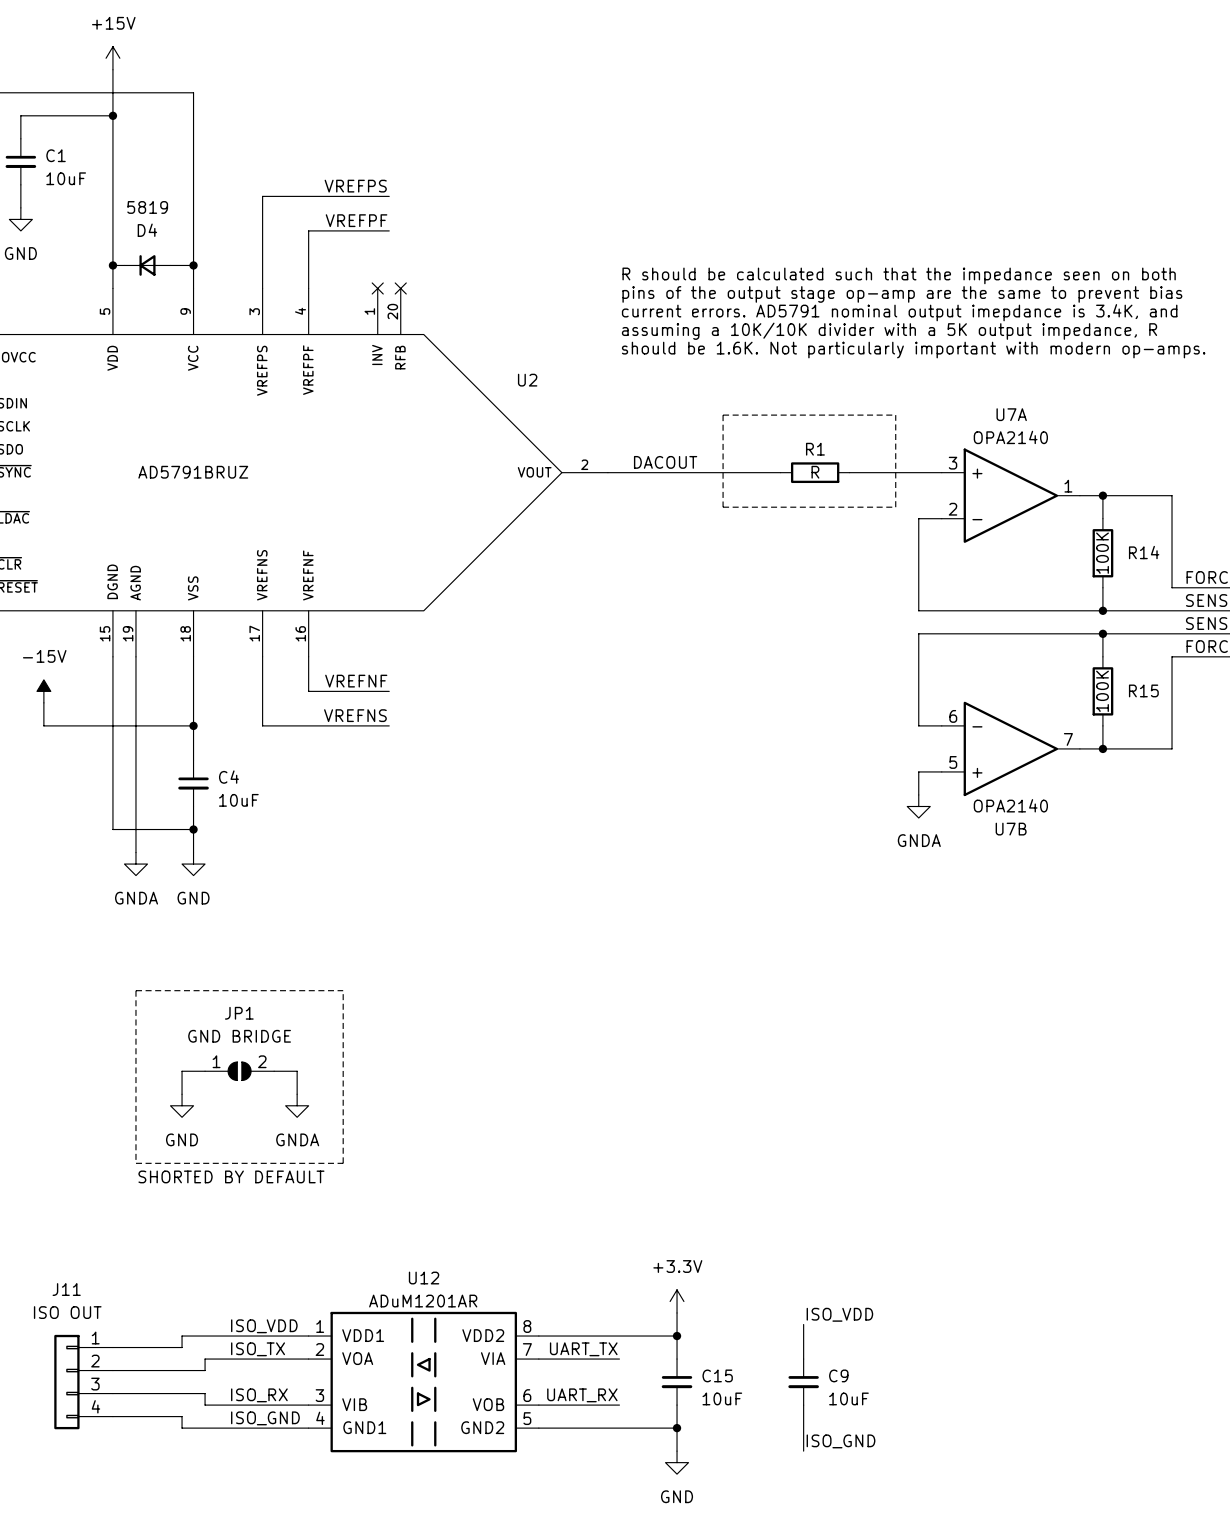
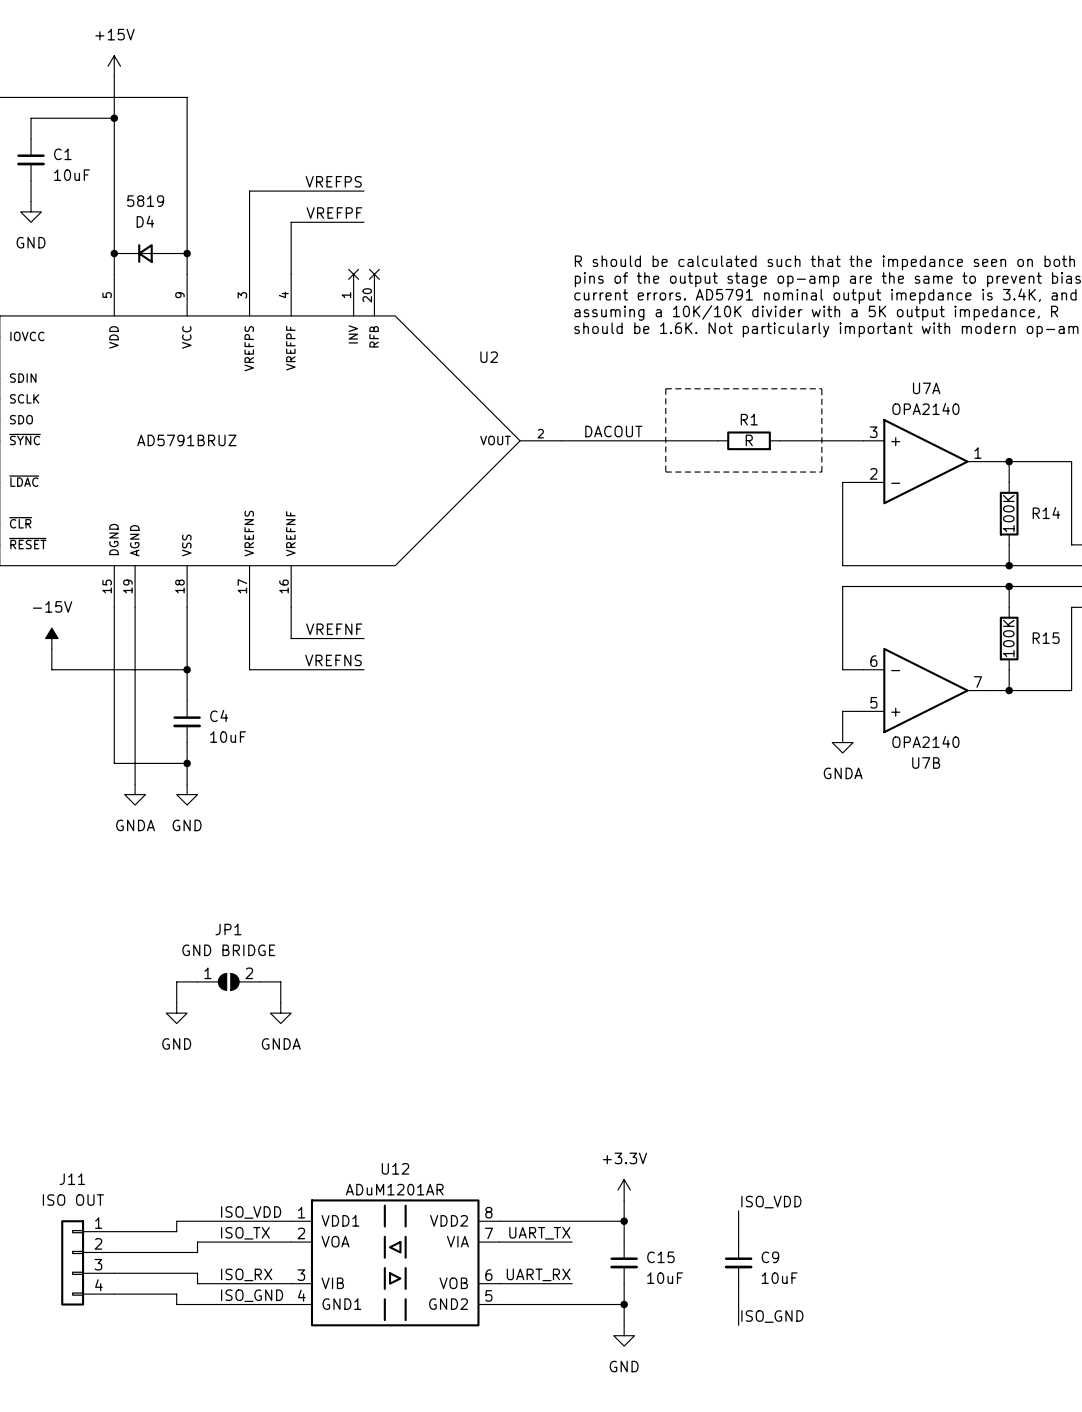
line: (135, 990) (135, 1163) (343, 1163) (343, 990) (135, 990) -> none
text: SHORTED BY DEFAULT (231, 1176) -> none

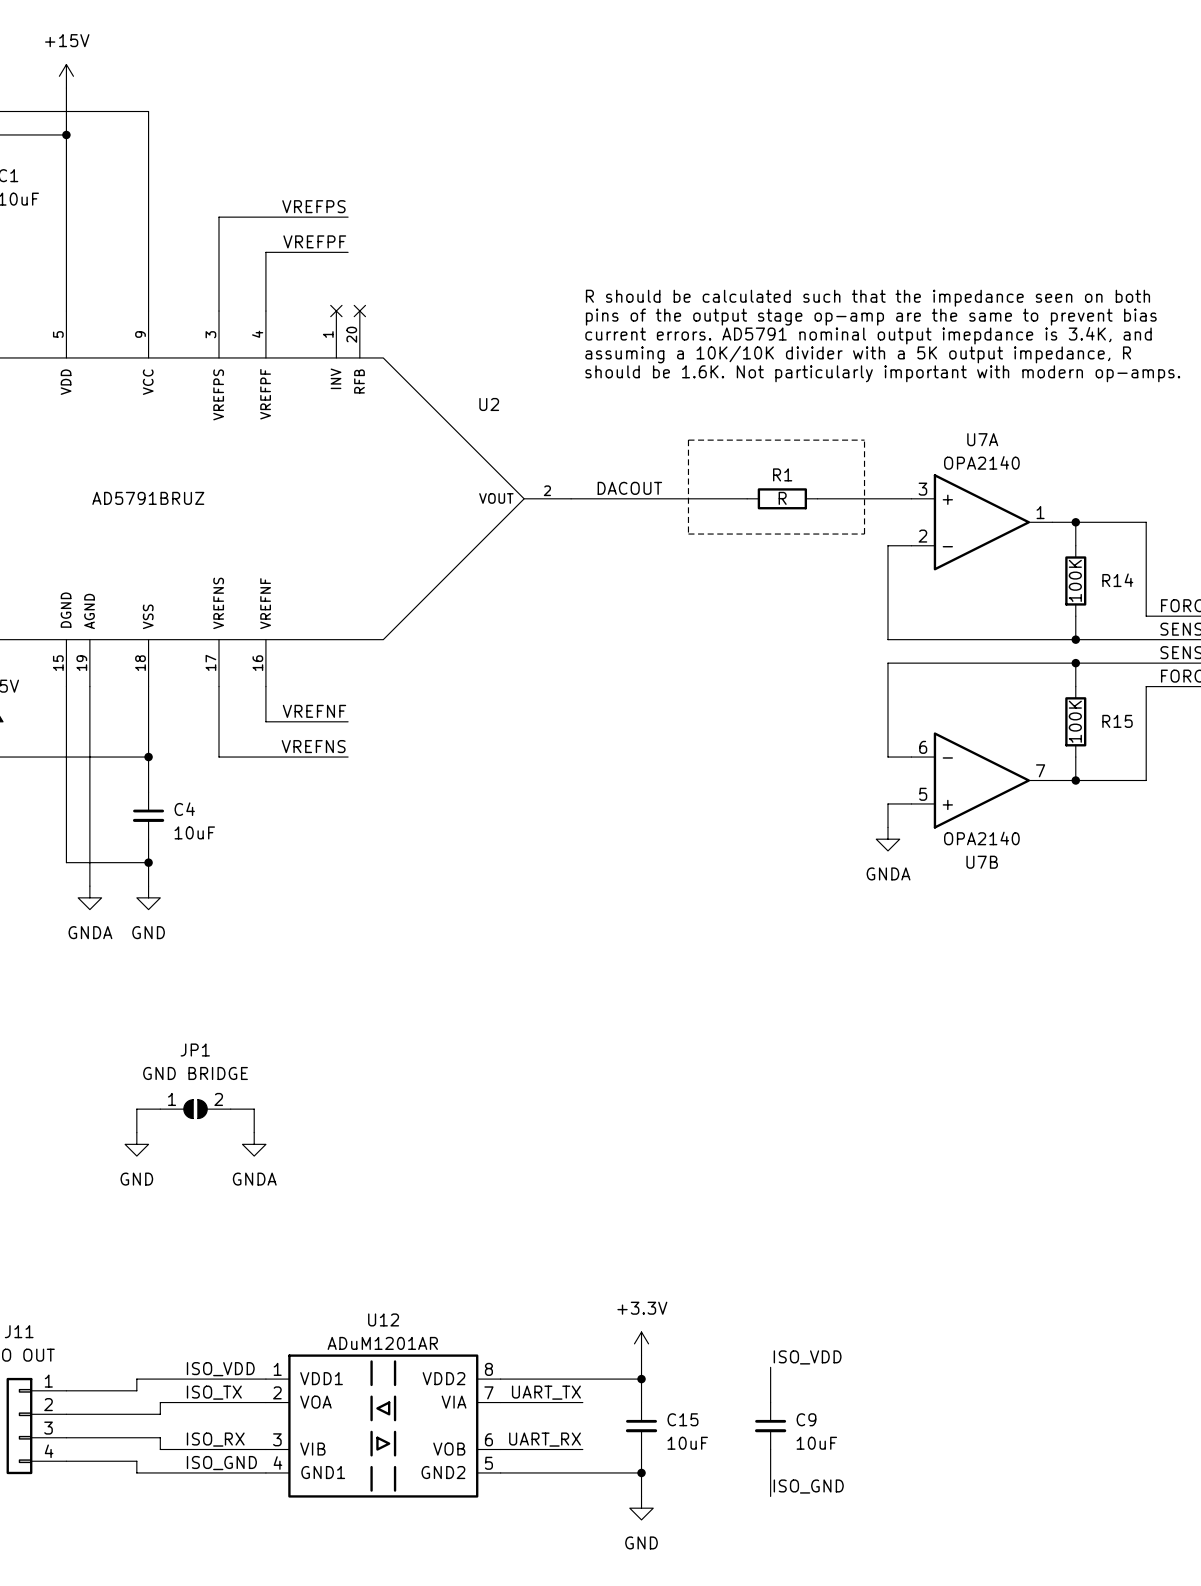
wire: (114, 253) (124, 253) -> none
junction: (114, 253) -> none
D4: 5819 (145, 253) -> none
wire: (166, 253) (187, 253) -> none
junction: (187, 253) -> none

